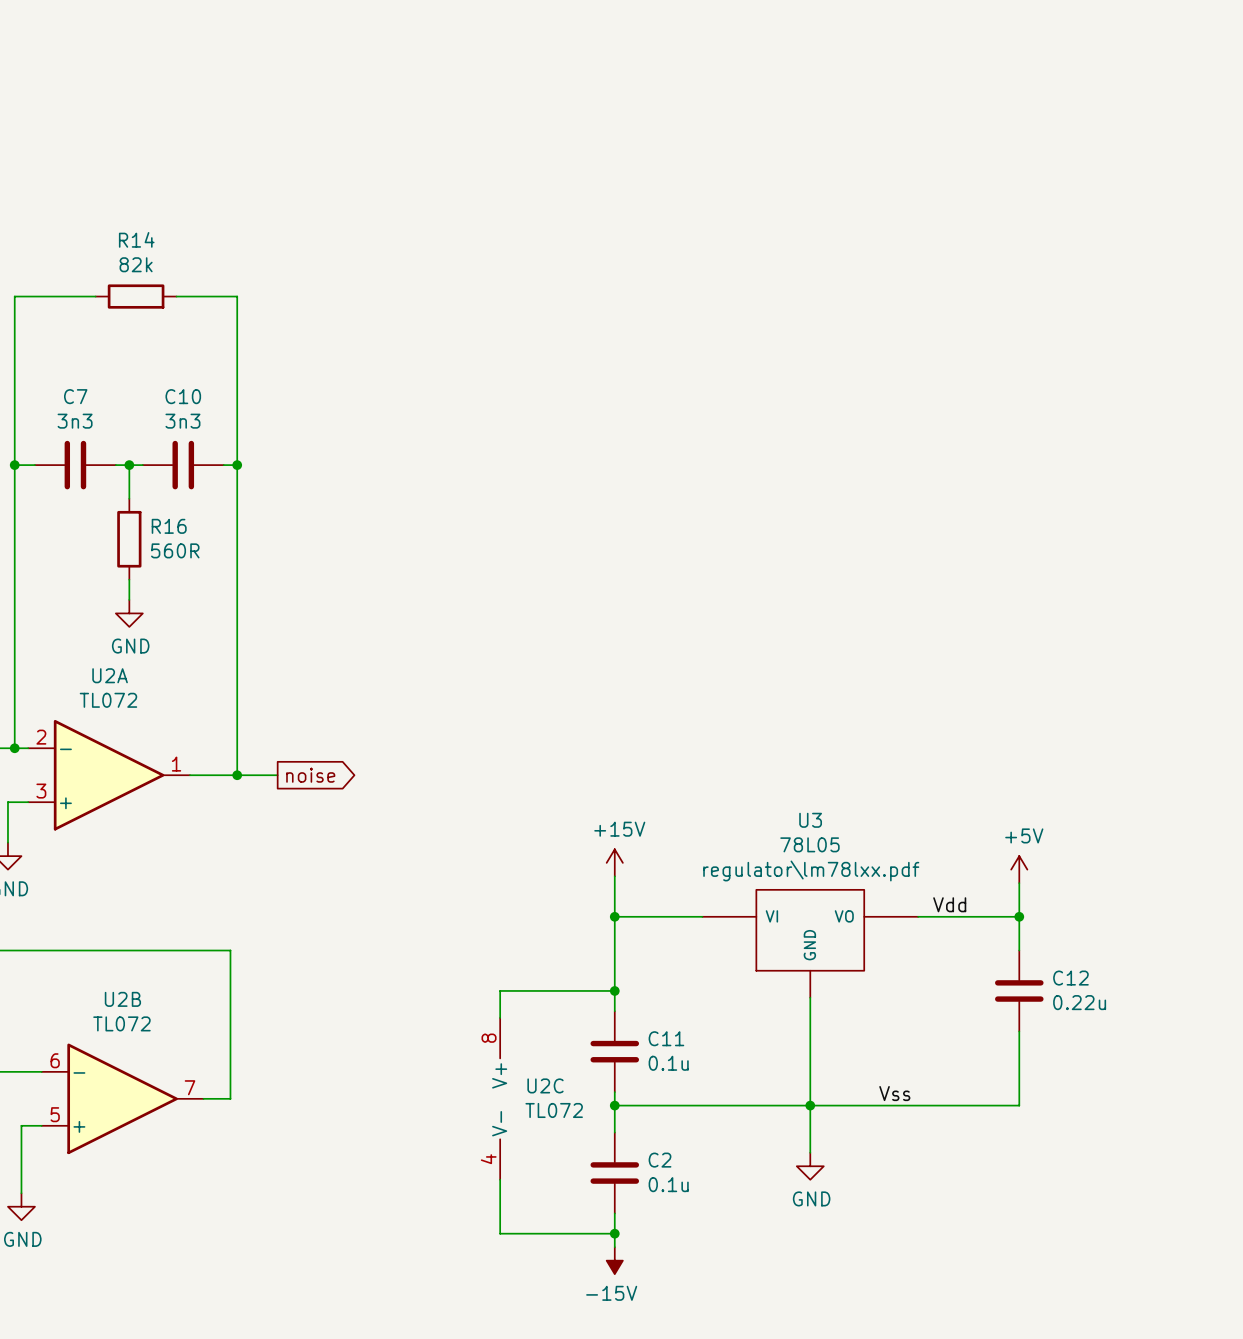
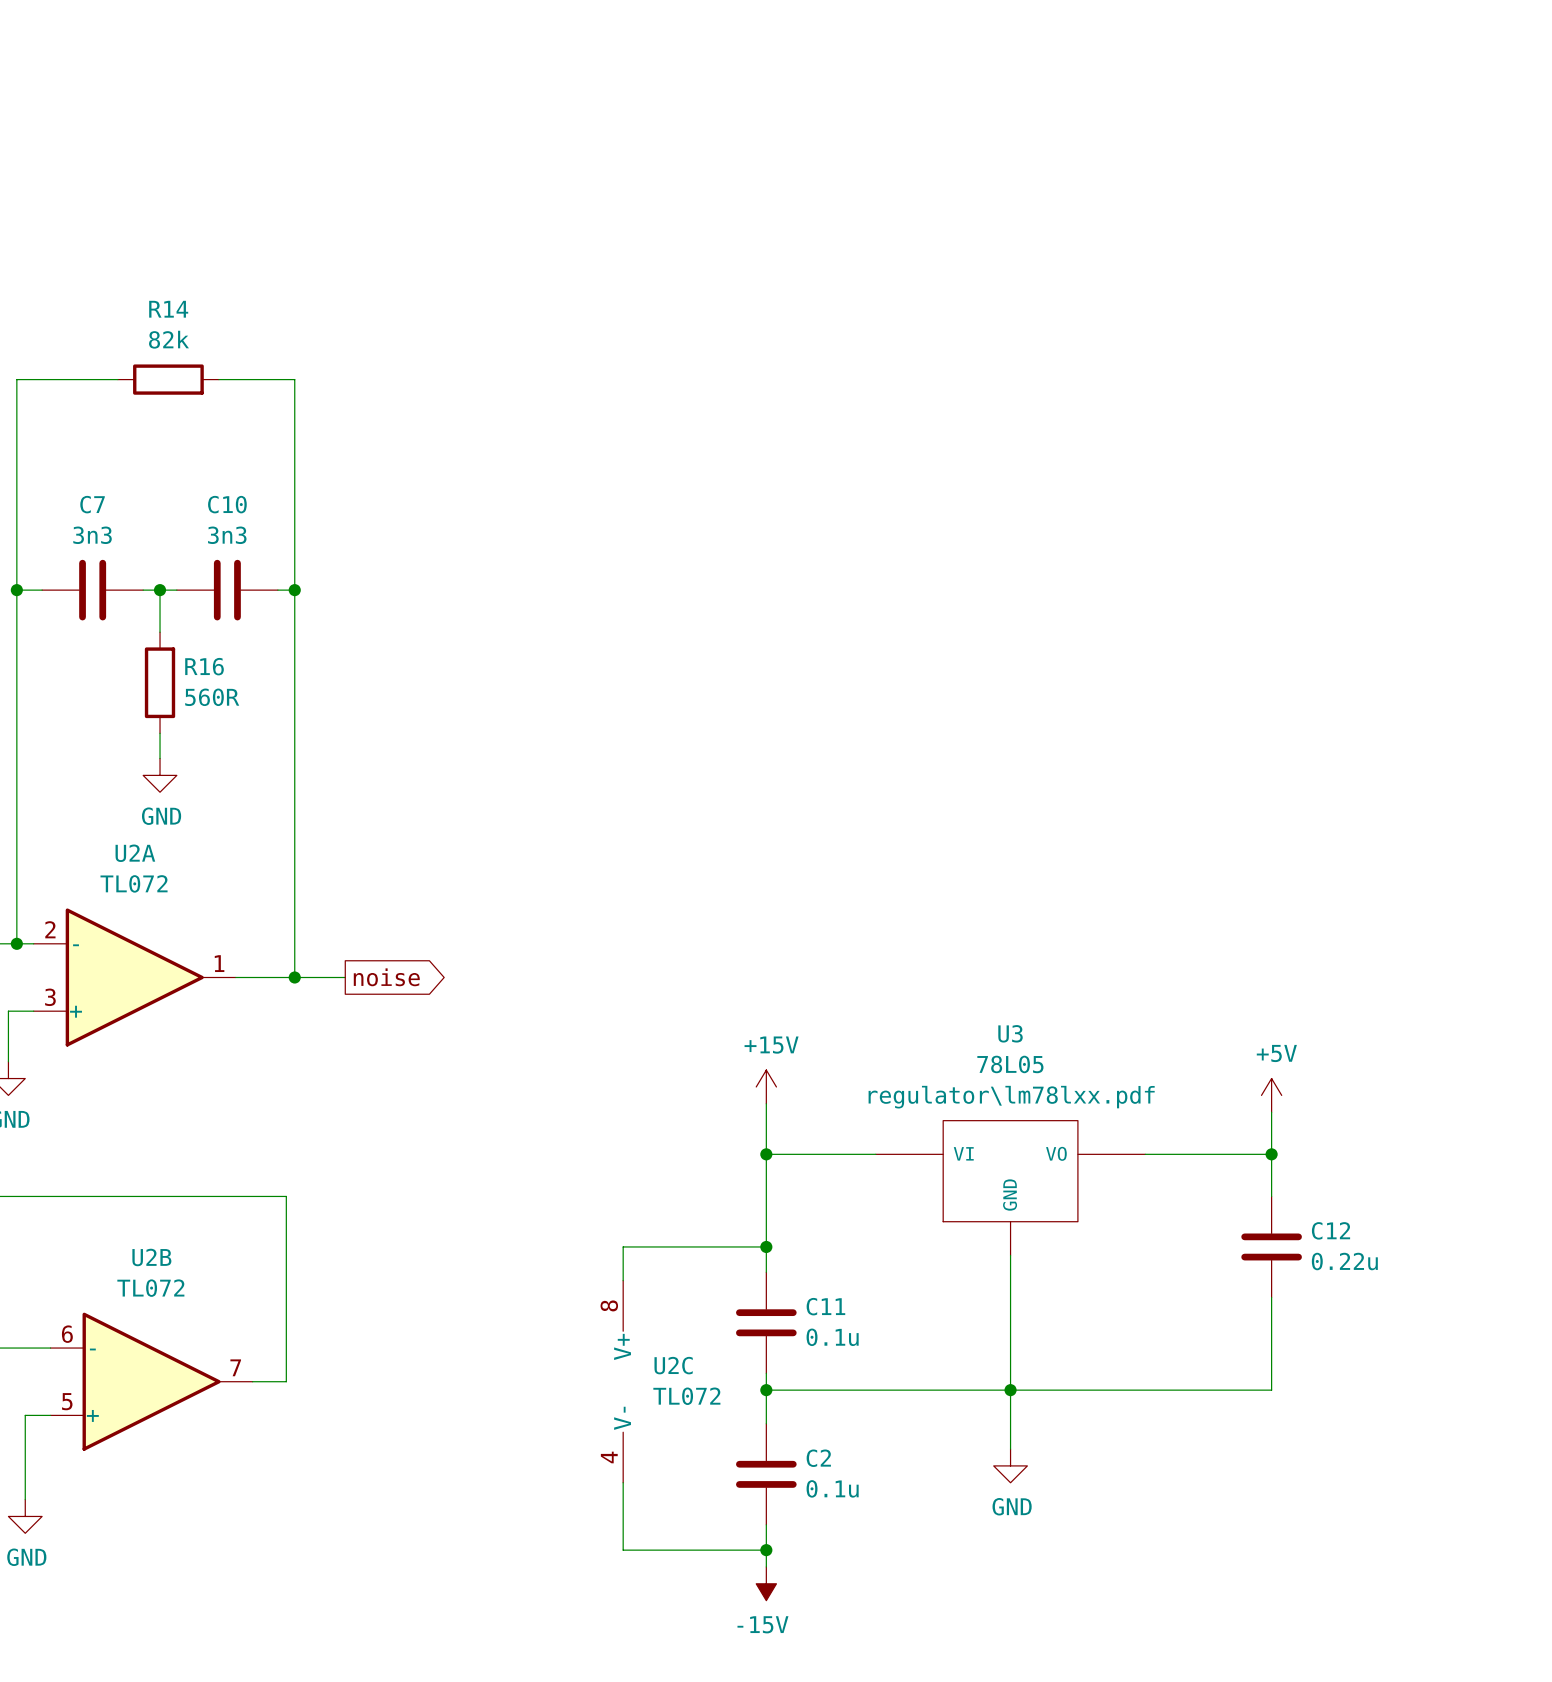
label: Vdd (949, 904) -> none
label: Vss (894, 1093) -> none

